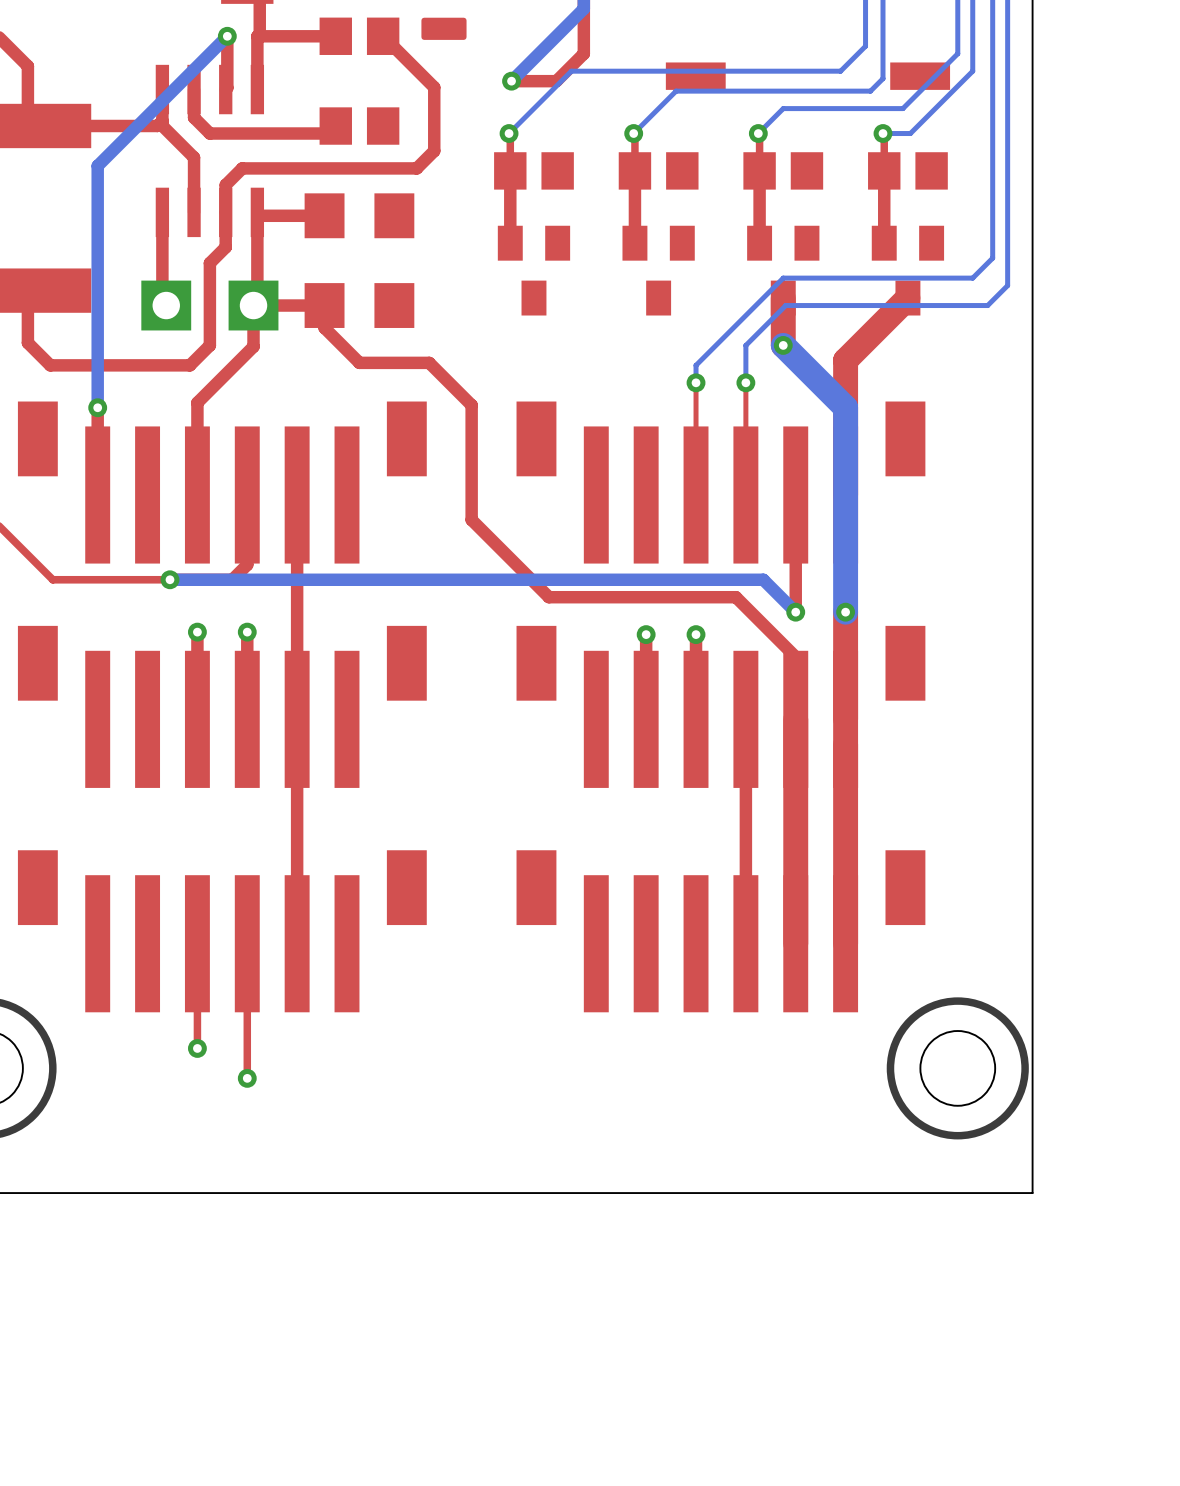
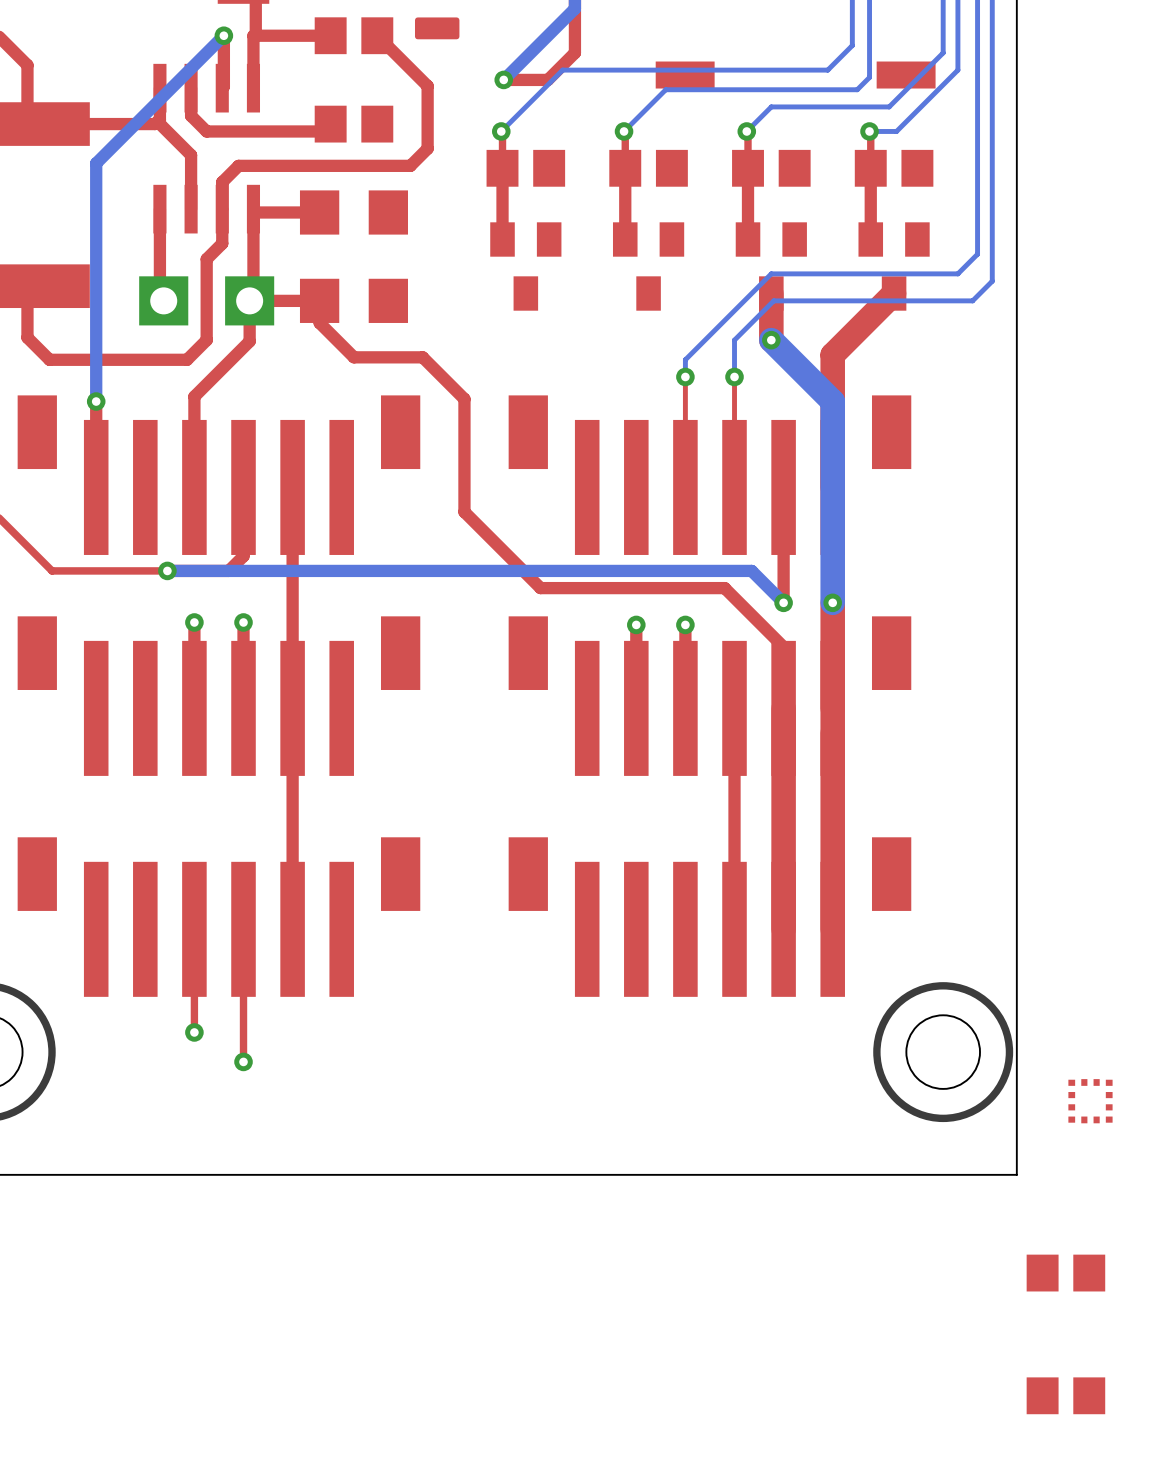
part: none -> (1090, 1101)
part: none -> (1065, 1273)
part: none -> (1065, 1395)

